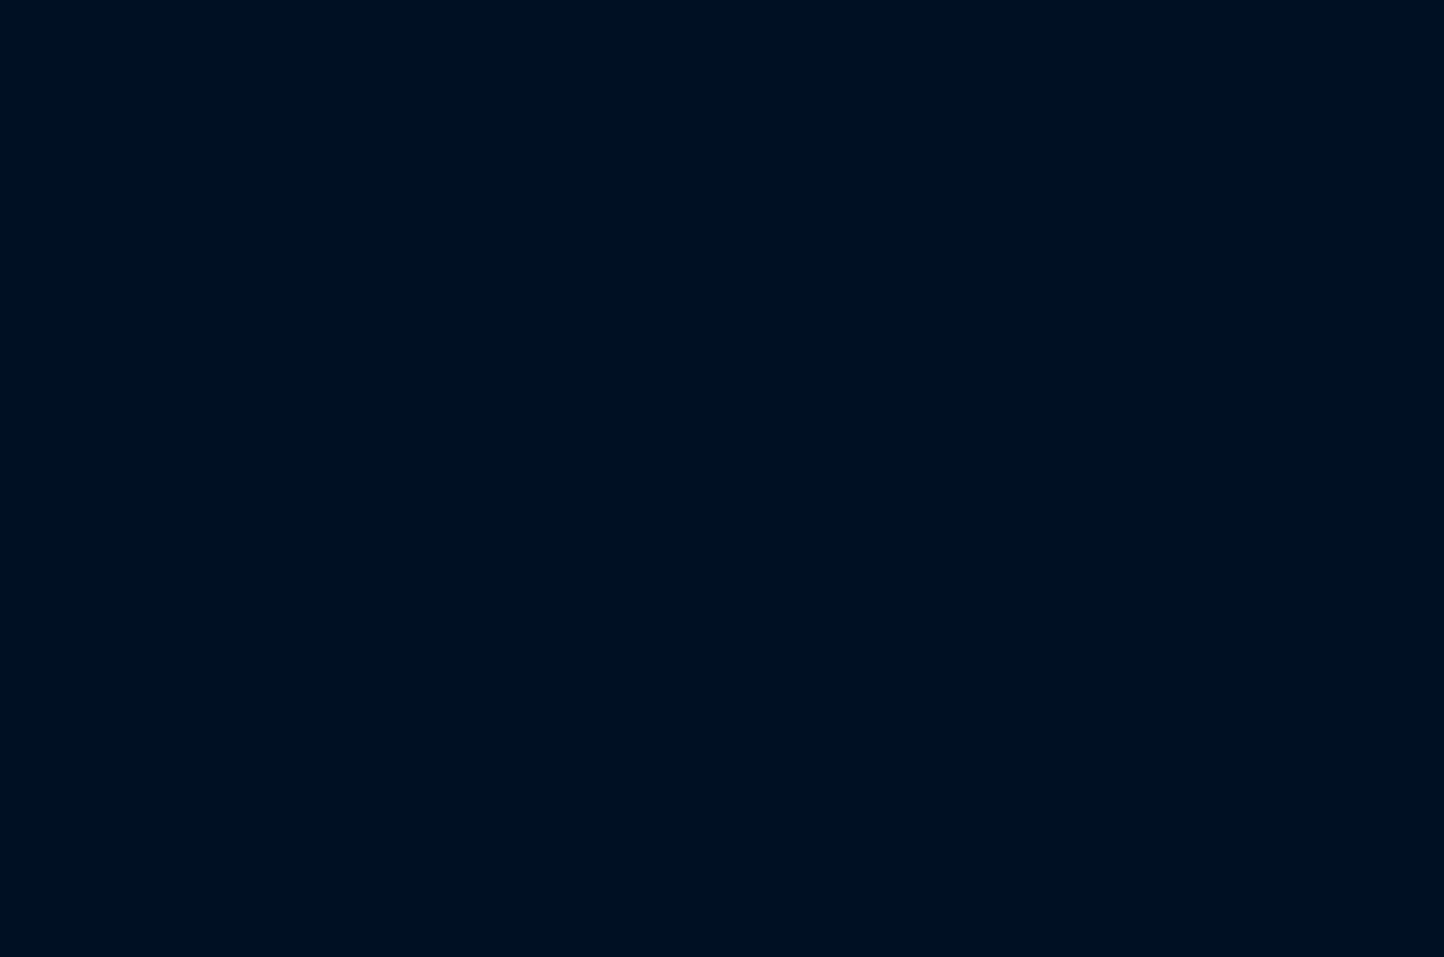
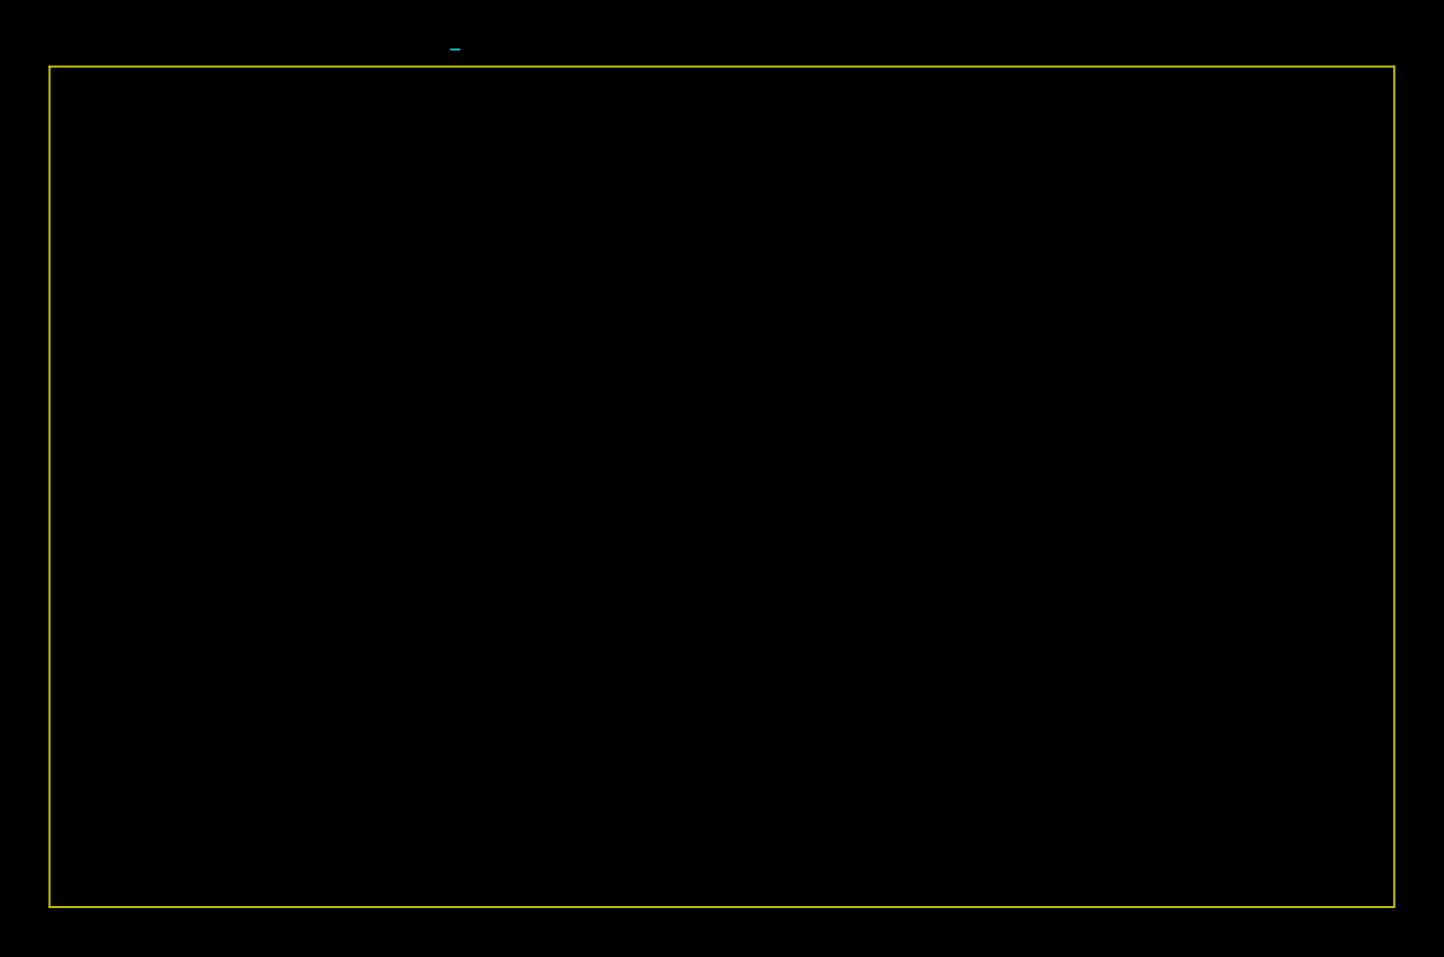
line: none -> (450, 49) (459, 49)
board edge: none -> (49, 66) (49, 907) (1394, 907) (1394, 66) (49, 66)

